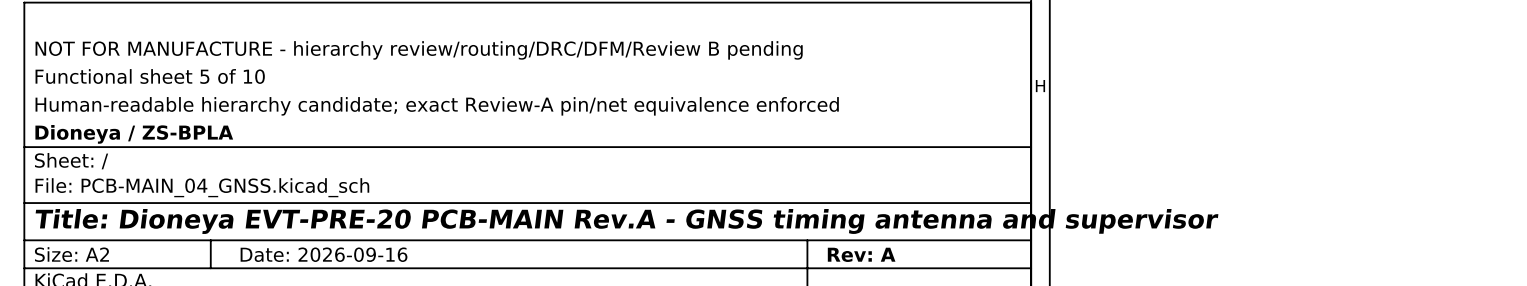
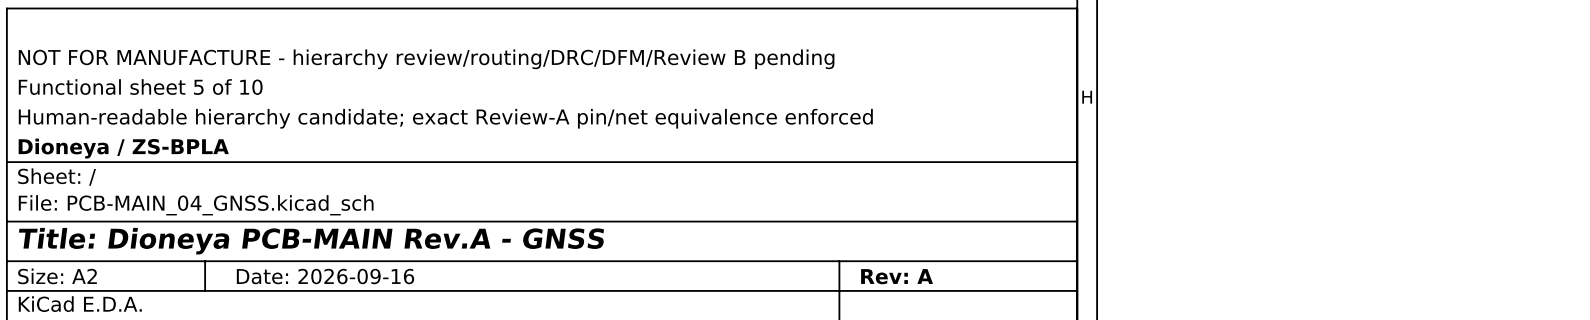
title block: Title: Dioneya EVT-PRE-20 PCB-MAIN Rev.A - GNSS timing antenna and supervisor (627, 221) -> Title: Dioneya PCB-MAIN Rev.A - GNSS (311, 241)

